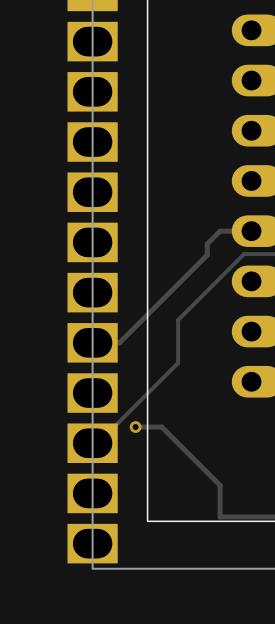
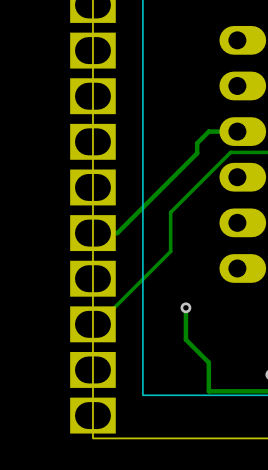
track: (135, 427) (161, 427) (194, 460) -> (185, 307) (185, 339)
via position: (135, 427) -> (185, 307)

